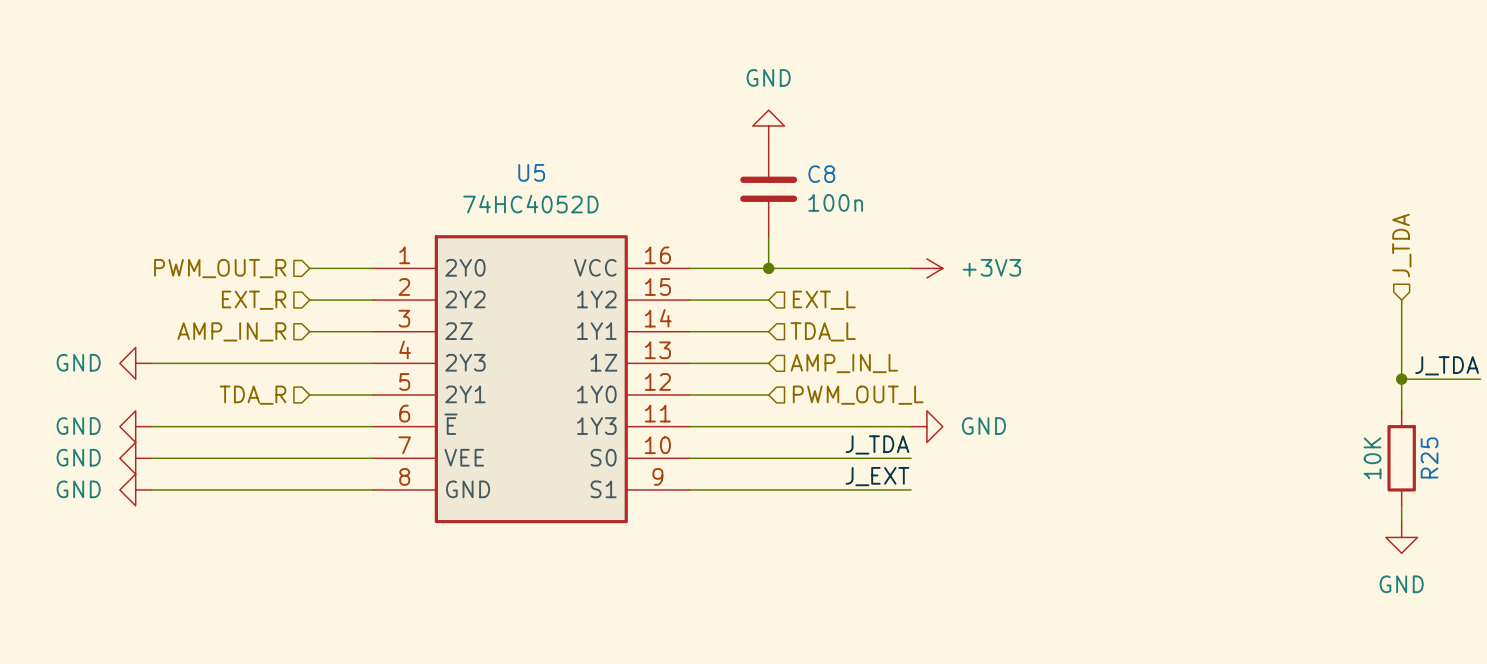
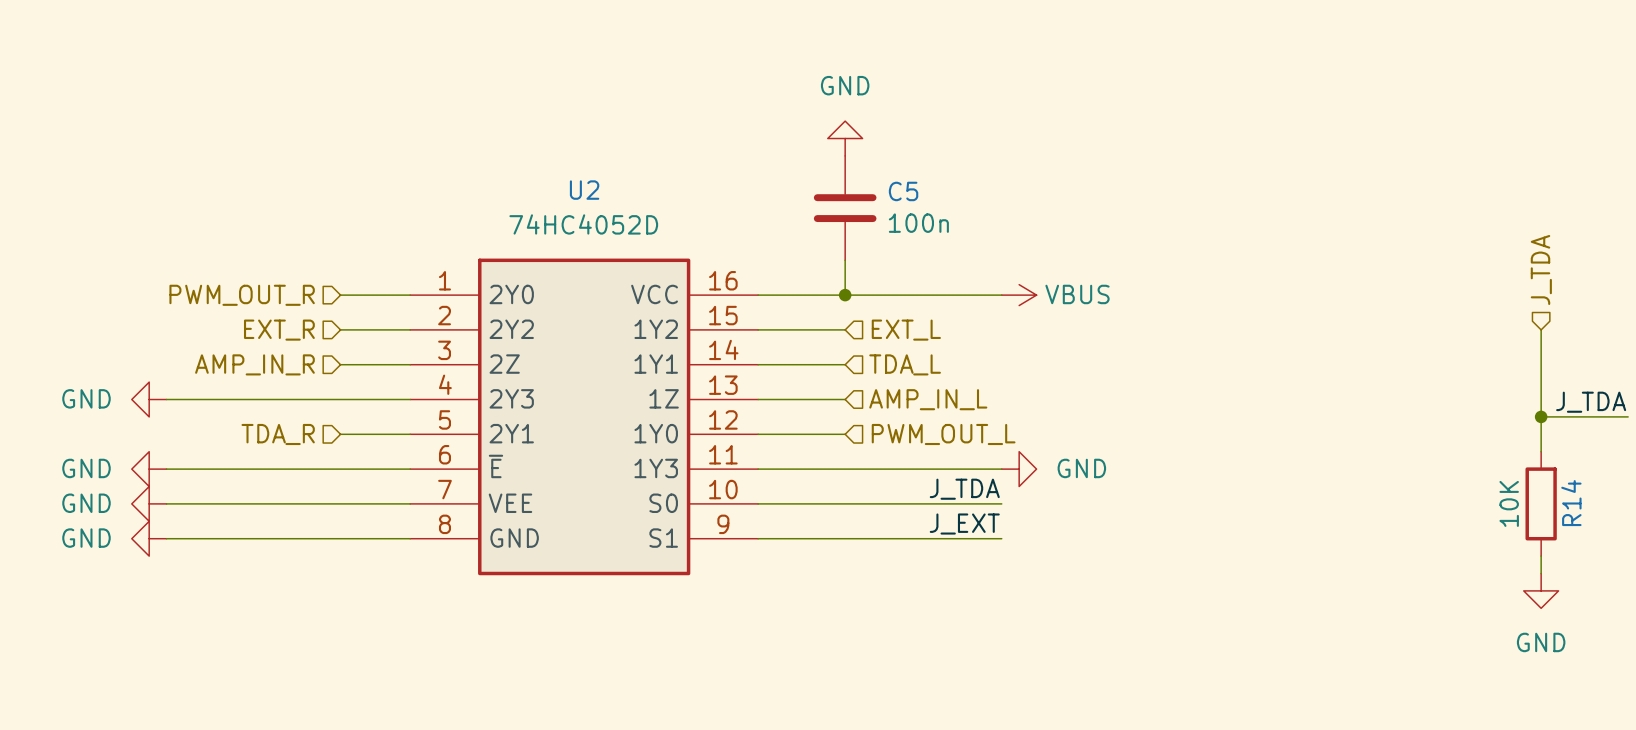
U5 name: U5 (531, 172) -> U2 (584, 190)
C8 name: C8 (821, 174) -> C5 (903, 191)
power symbol: +3V3 (926, 268) -> VBUS (1019, 295)
R25 name: R25 (1429, 457) -> R14 (1571, 503)

